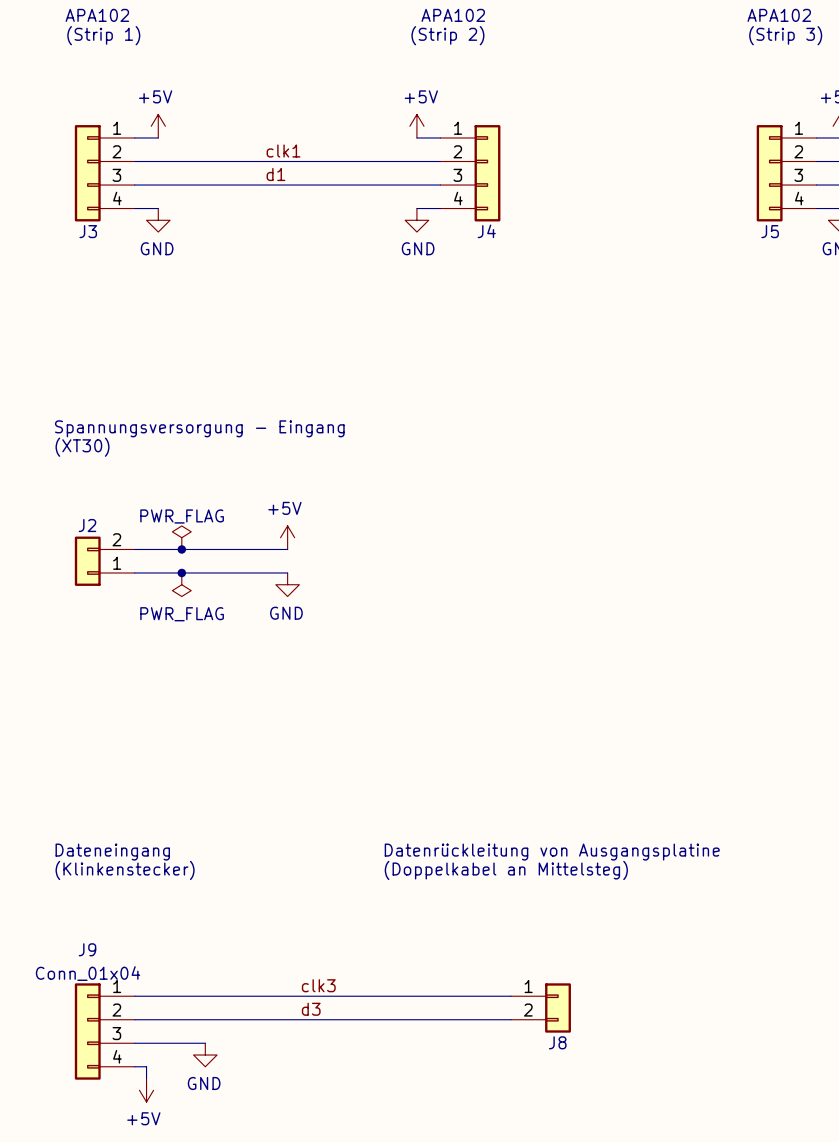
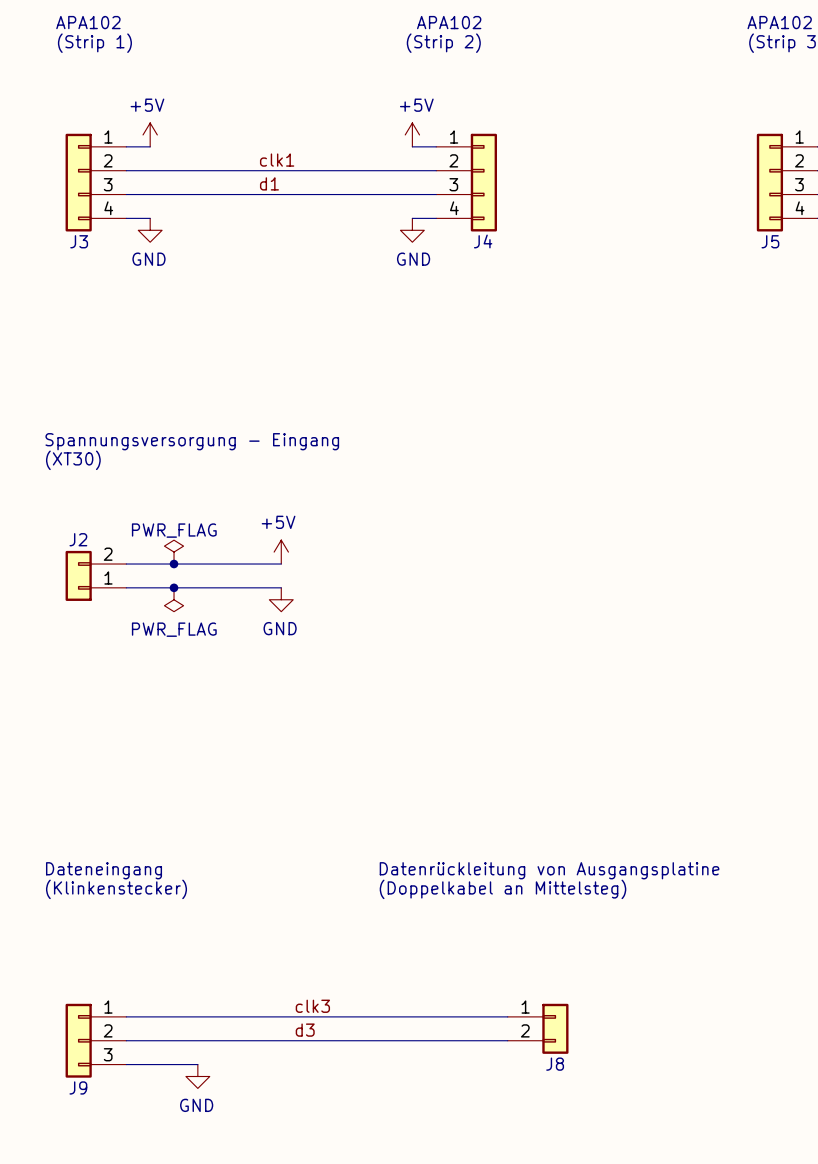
J9 name position: J9 (87, 949) -> J9 (78, 1087)
J9 value: Conn_01x04 (88, 973) -> none
J9 symbol: [74, 983, 135, 1080] -> [65, 1003, 127, 1078]
wire: (134, 1066) (146, 1066) (146, 1078) -> none
power symbol: +5V (146, 1090) -> none

